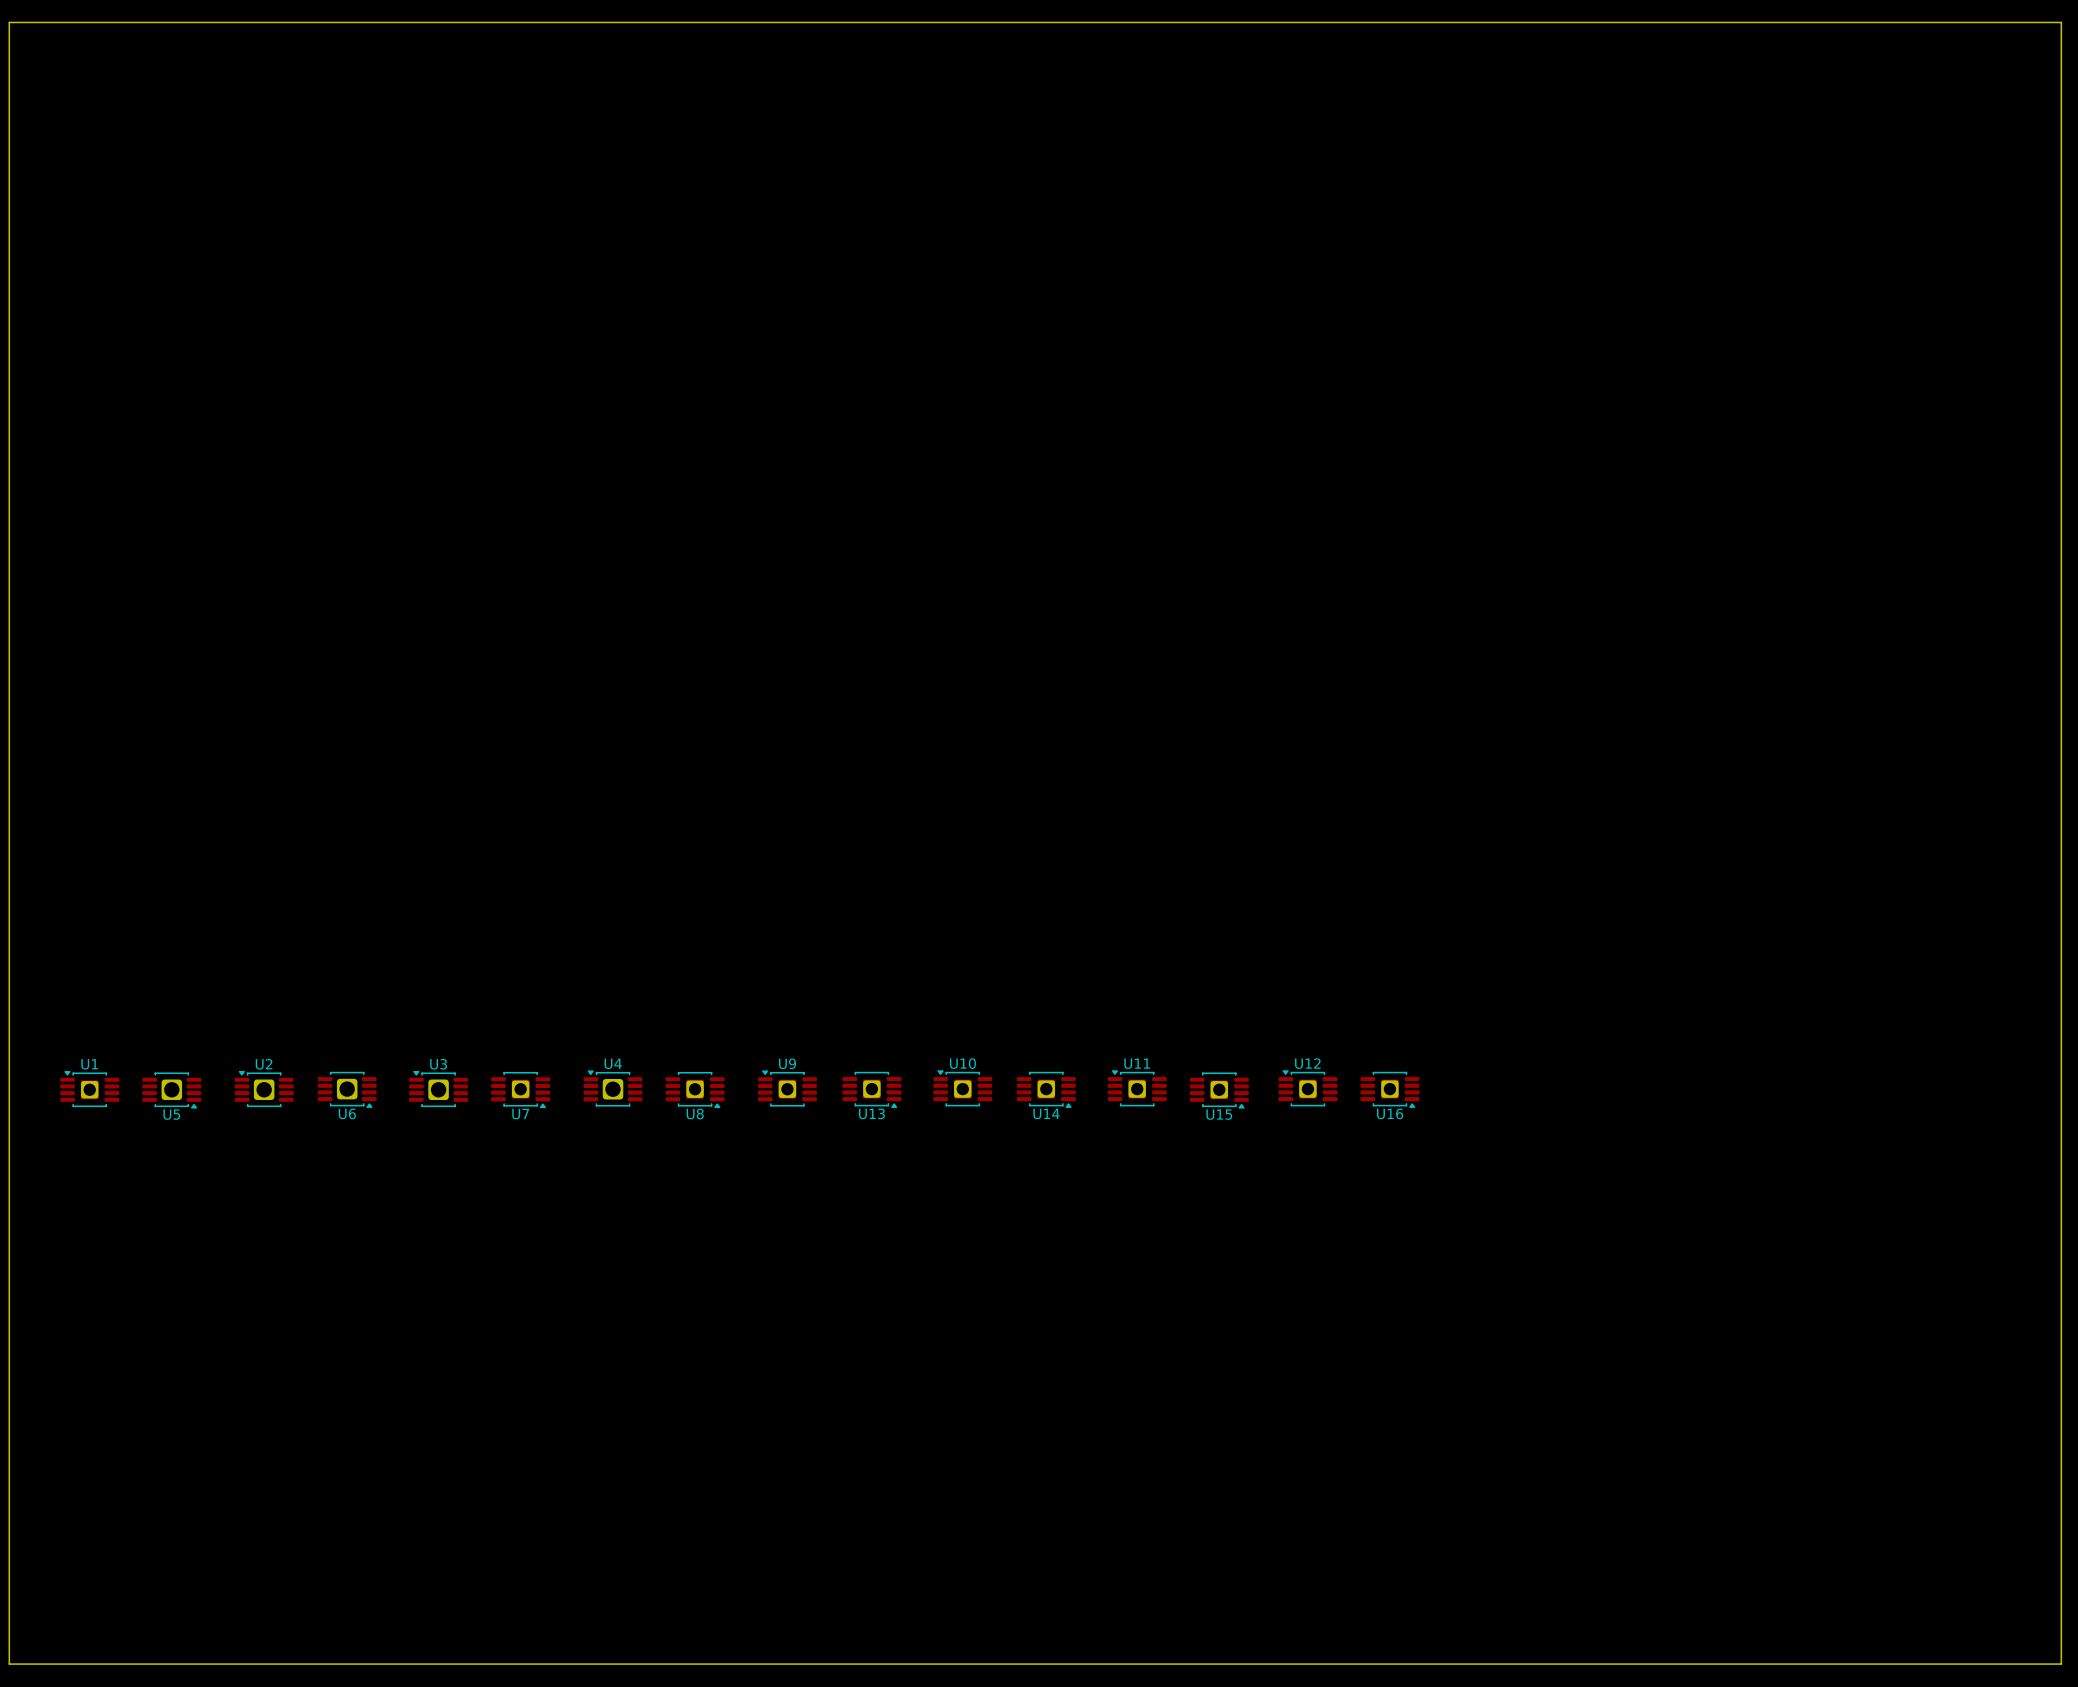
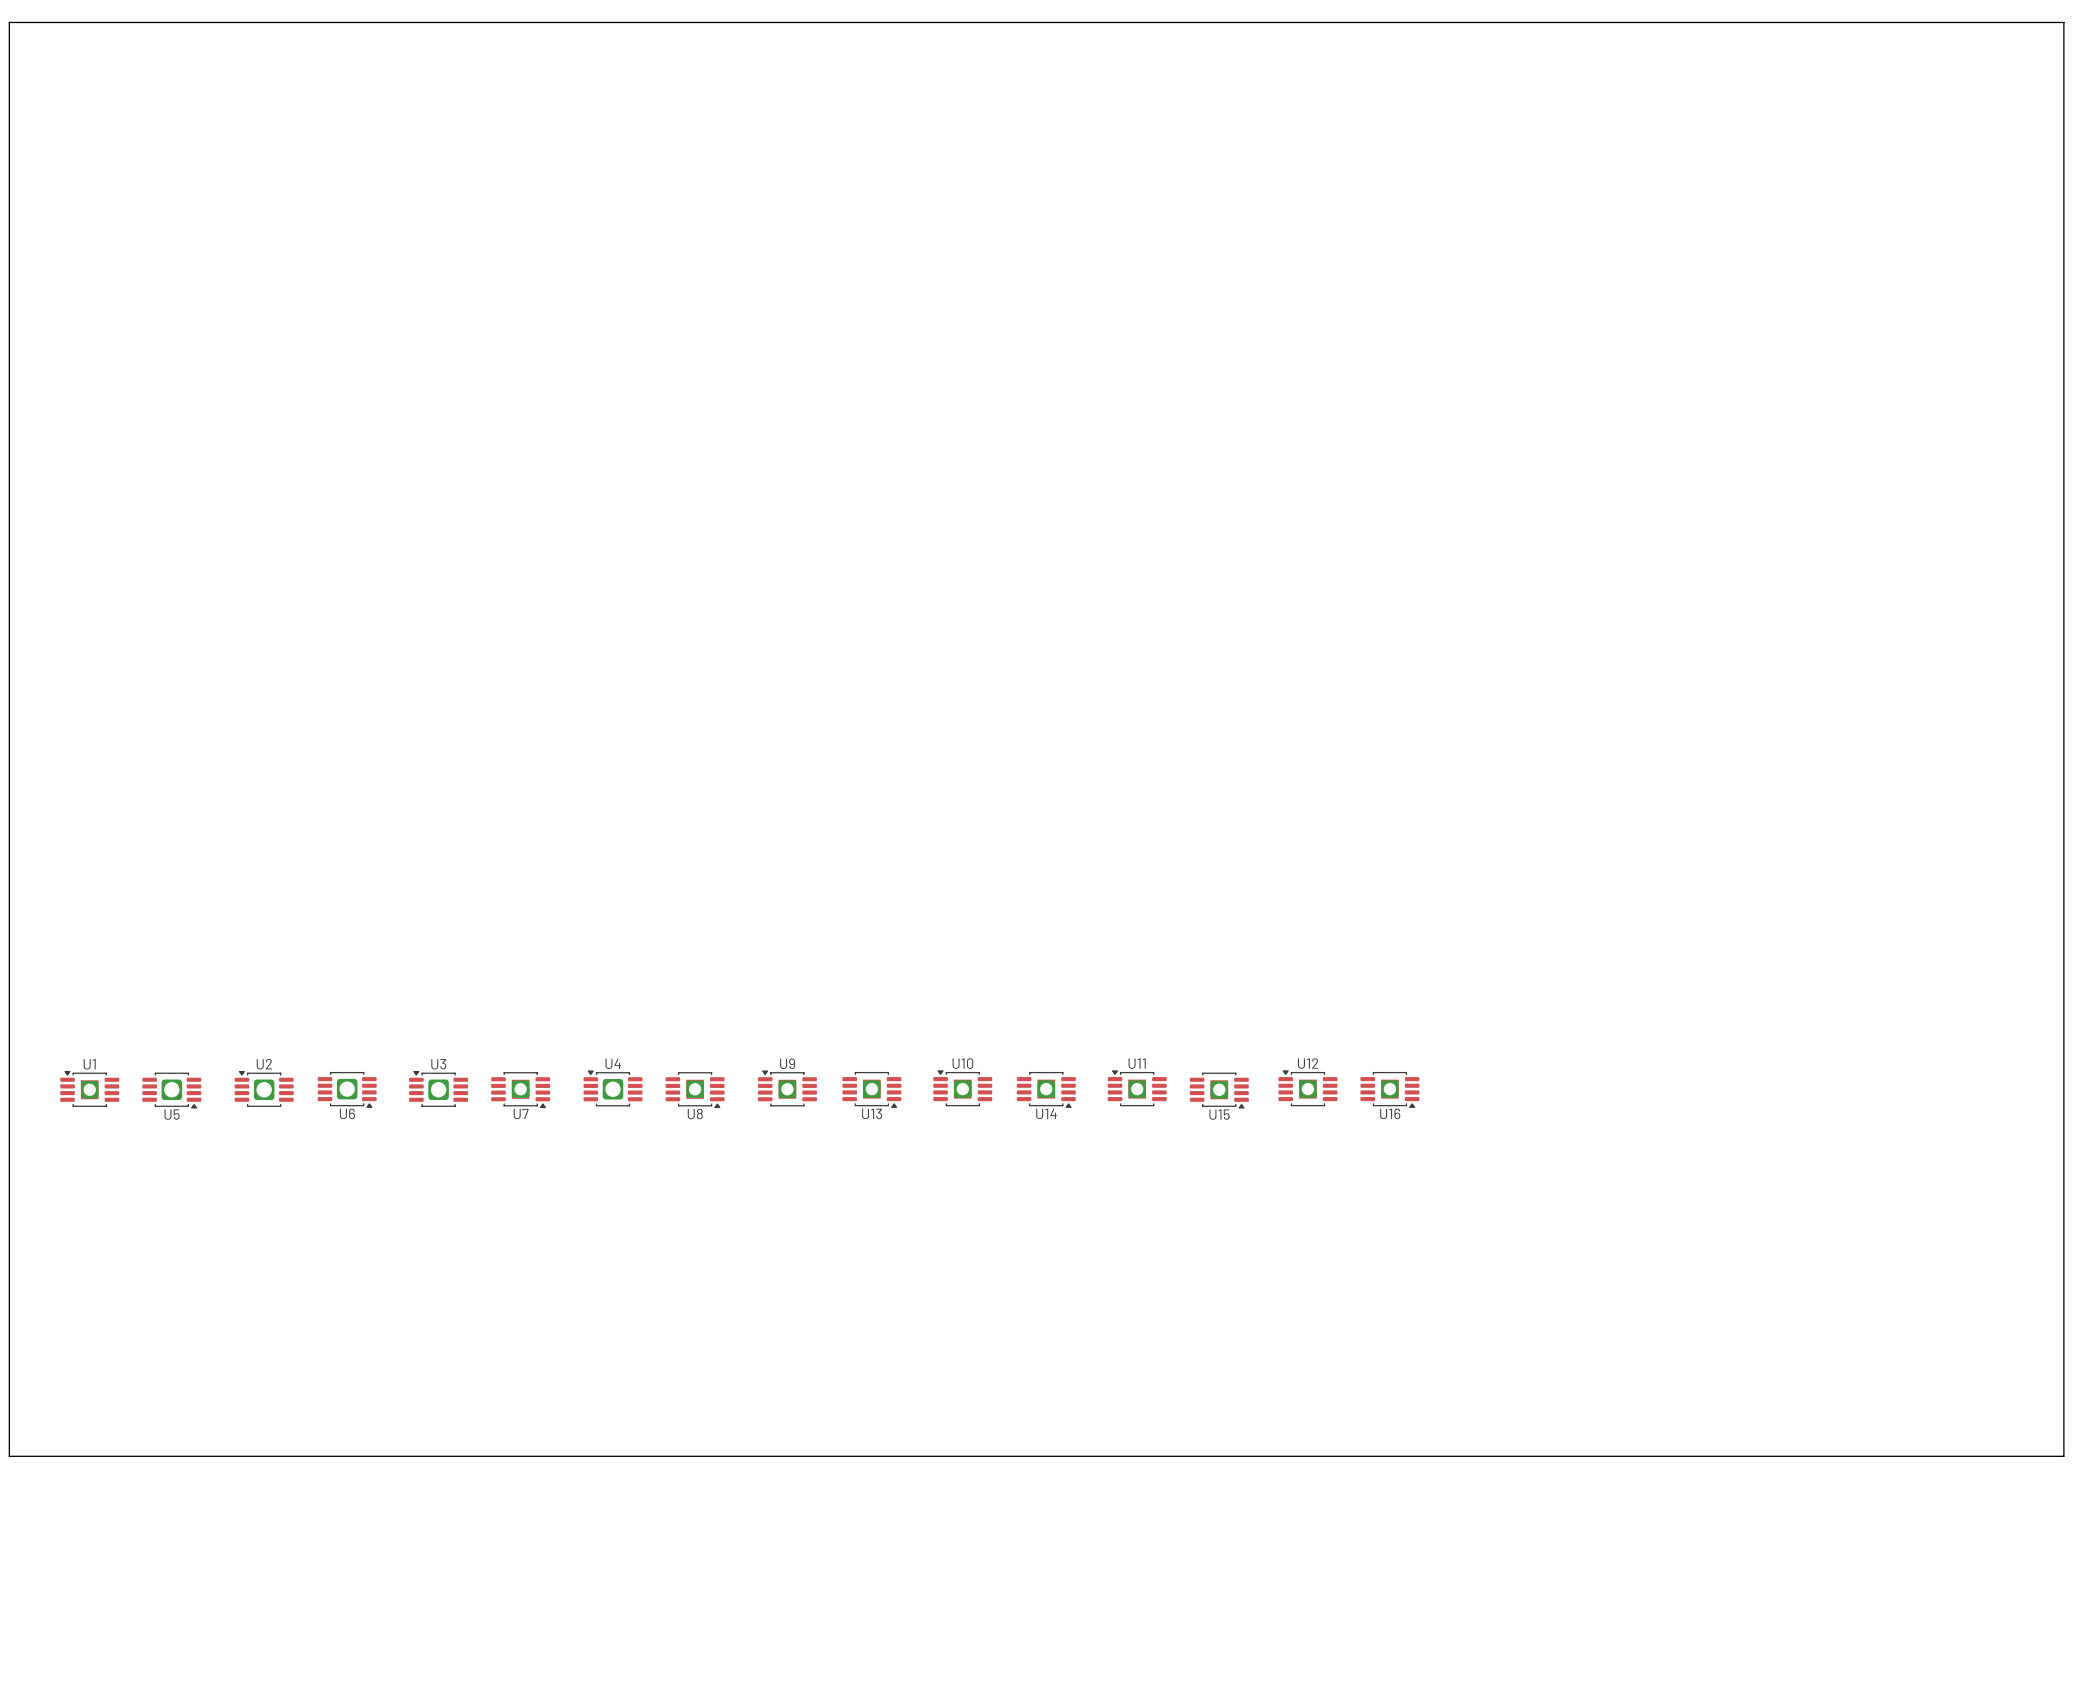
board edge: (2061, 22) (2061, 1664) (9, 1664) (9, 1456) -> (2061, 22) (2063, 22) (2063, 1456) (9, 1456)

